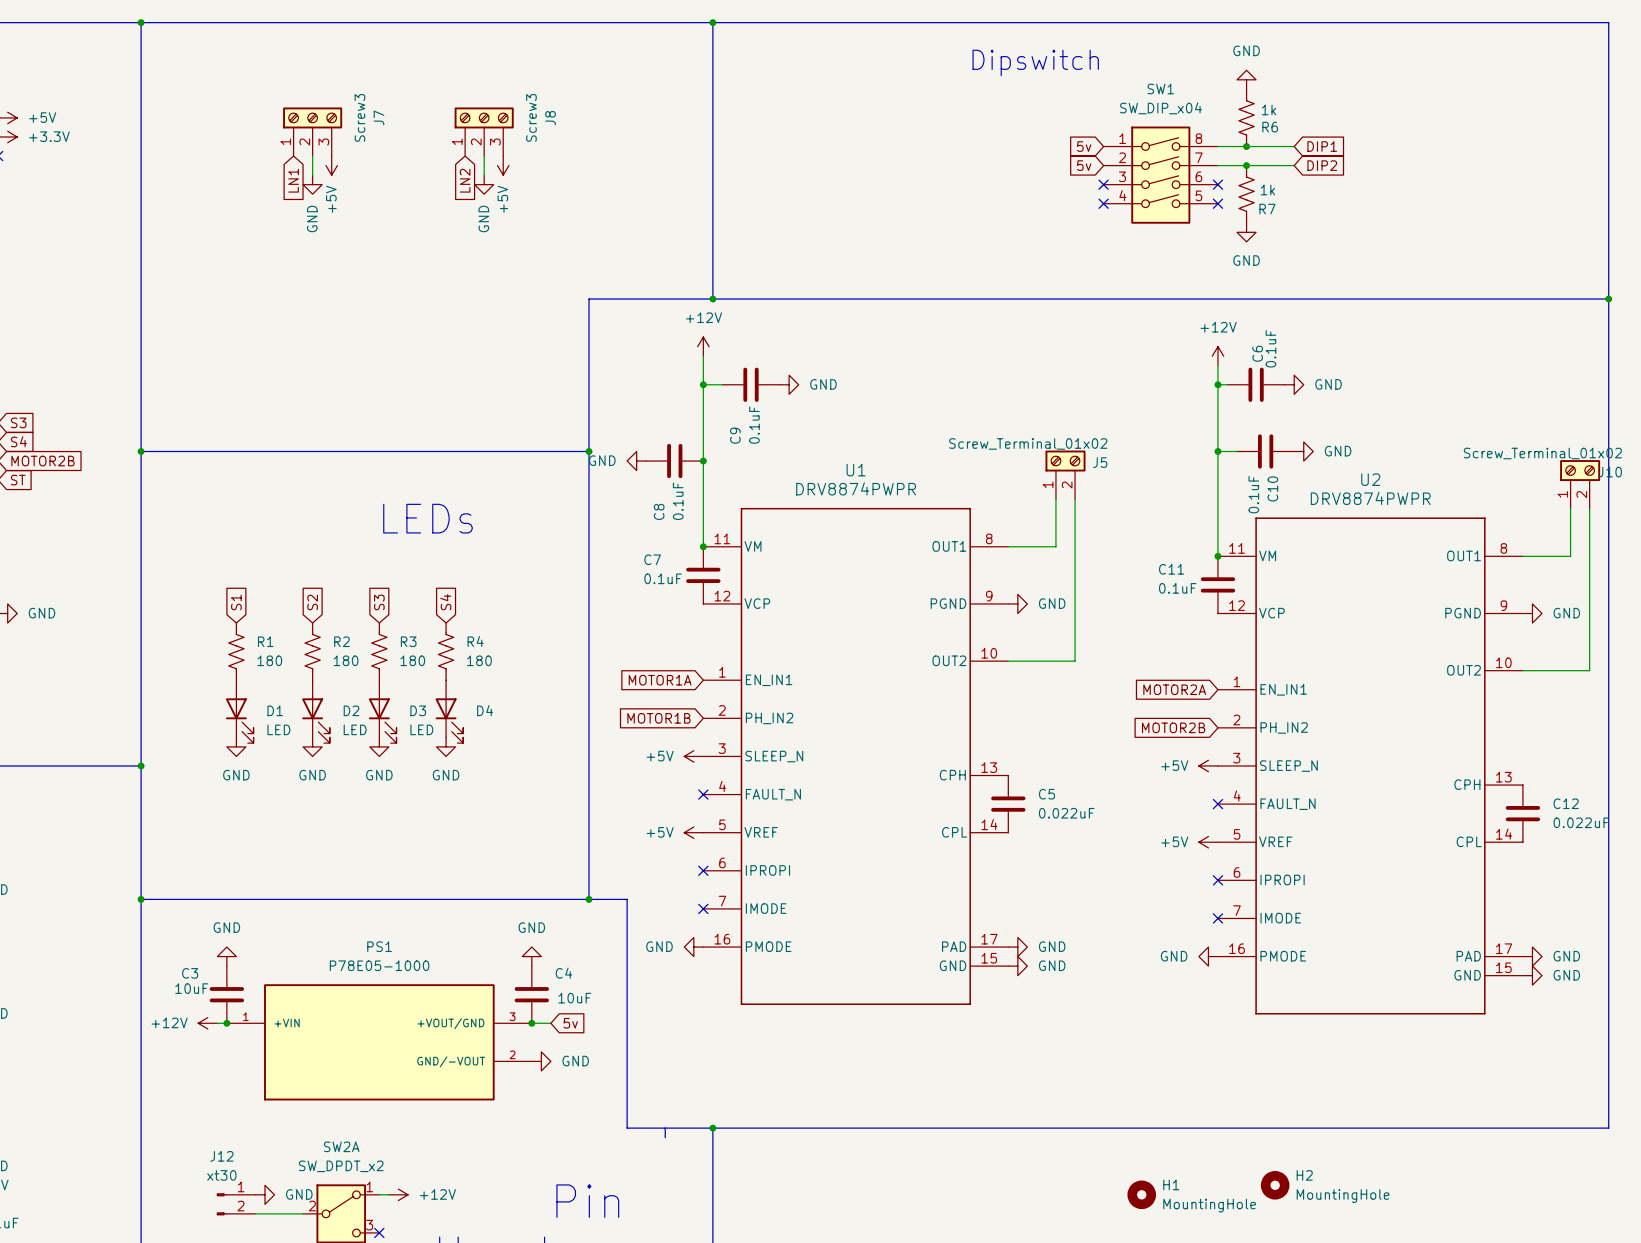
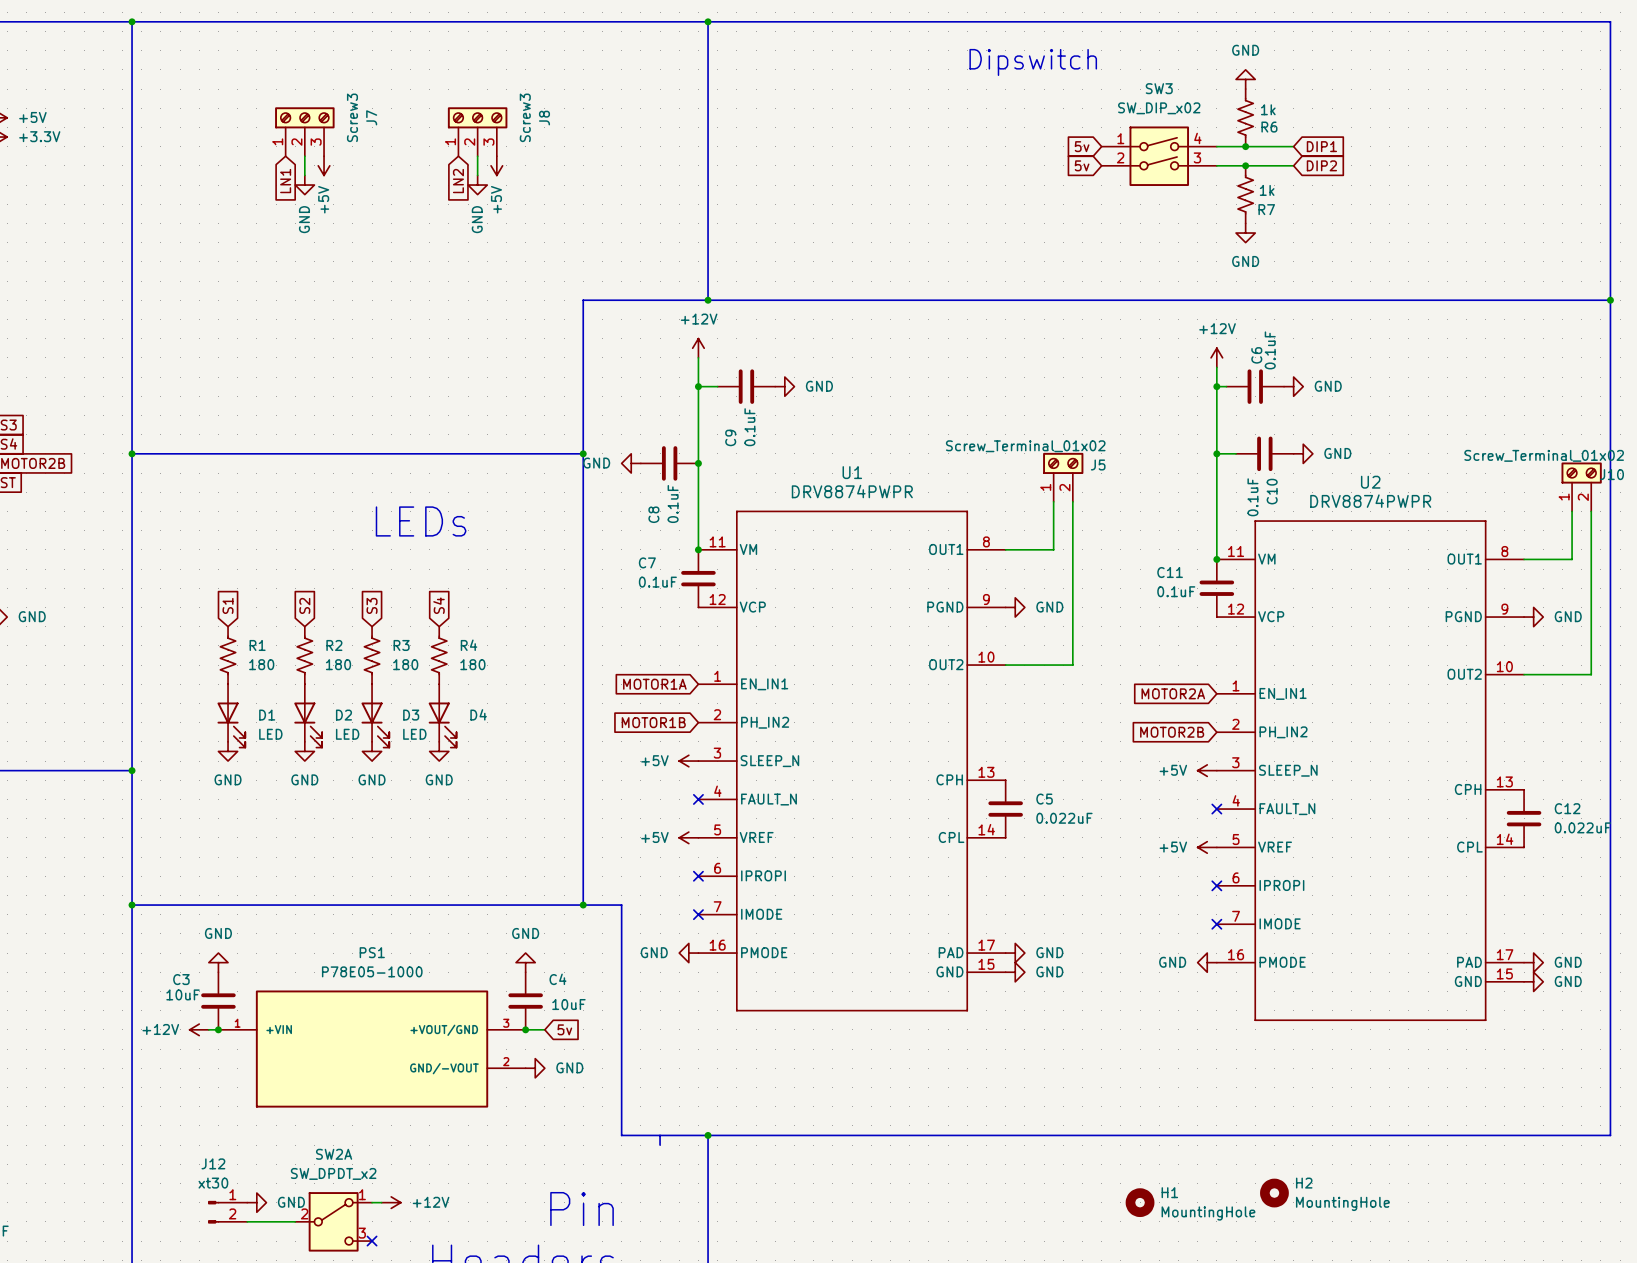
SW3: none -> SW_DIP_x02 (1159, 156)
SW1: SW_DIP_x04 (1160, 175) -> none
no-connect mark: (1103, 184) -> none
no-connect mark: (1217, 184) -> none
no-connect mark: (1103, 203) -> none
no-connect mark: (1217, 203) -> none

